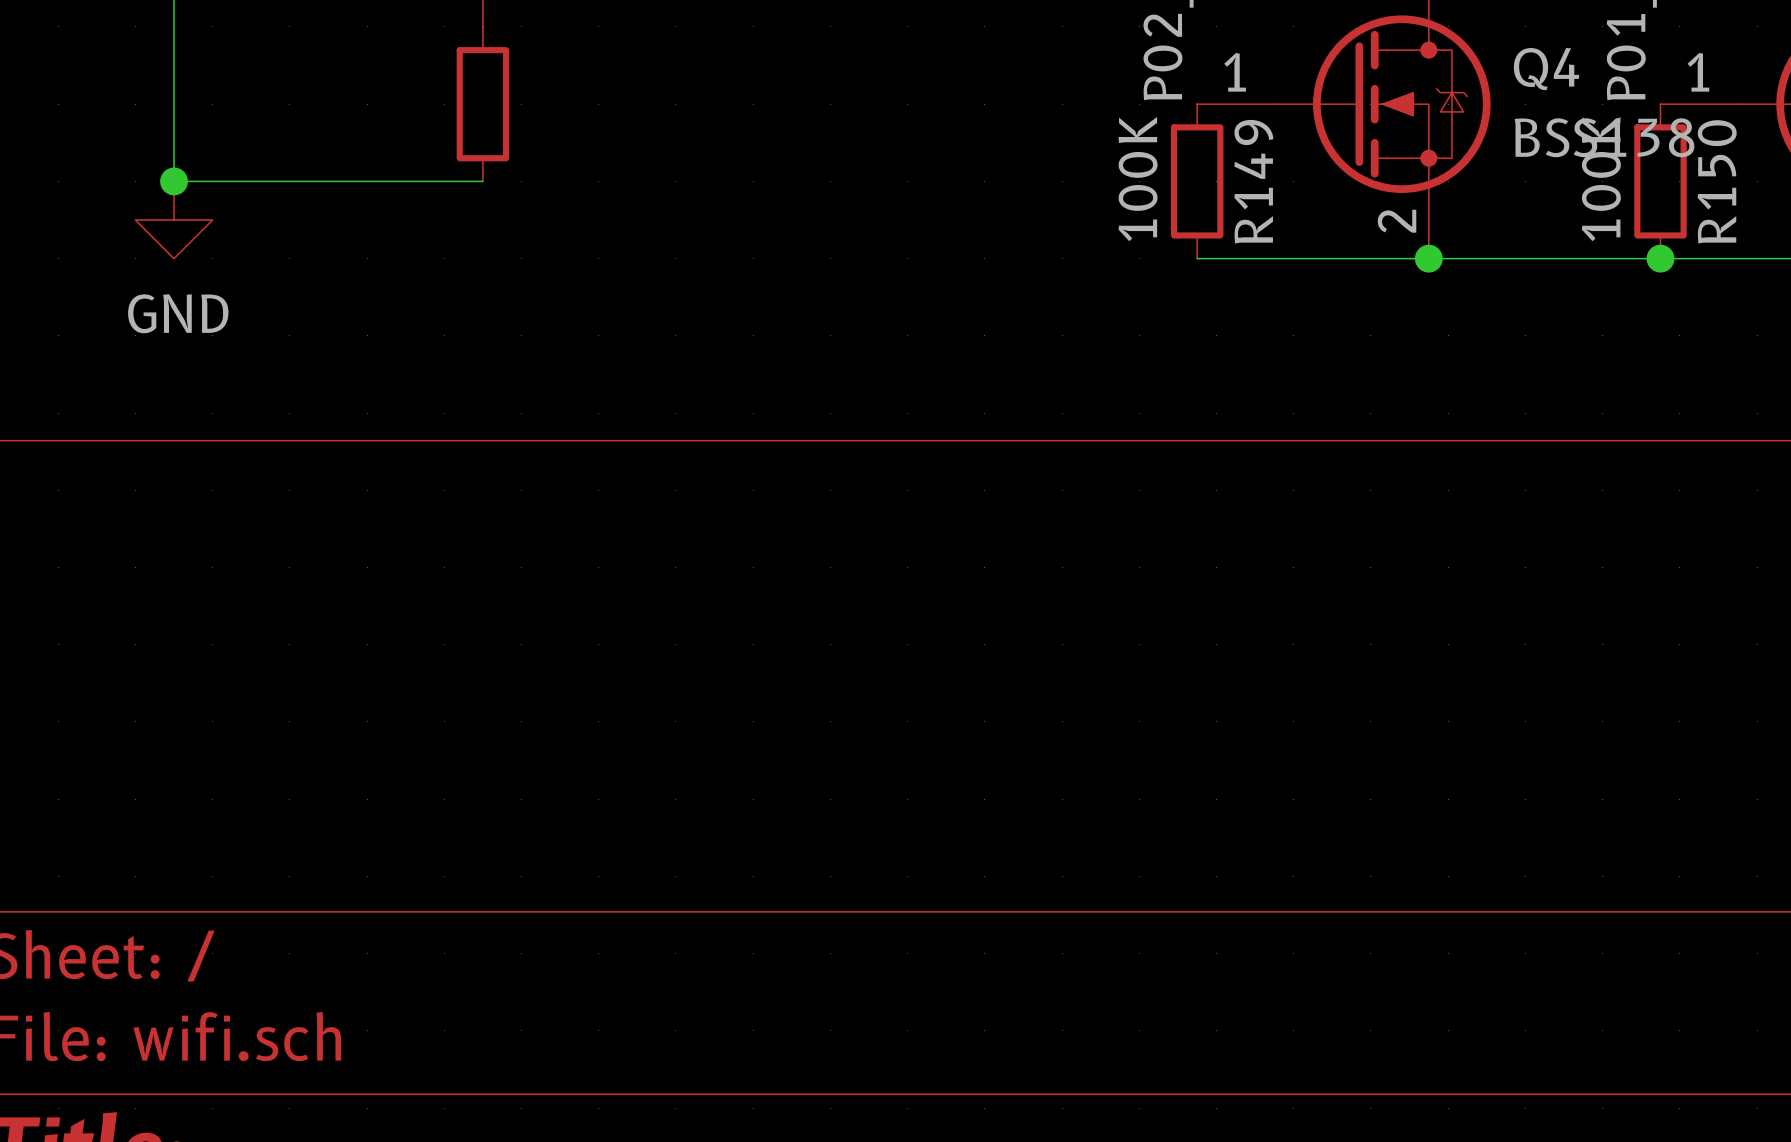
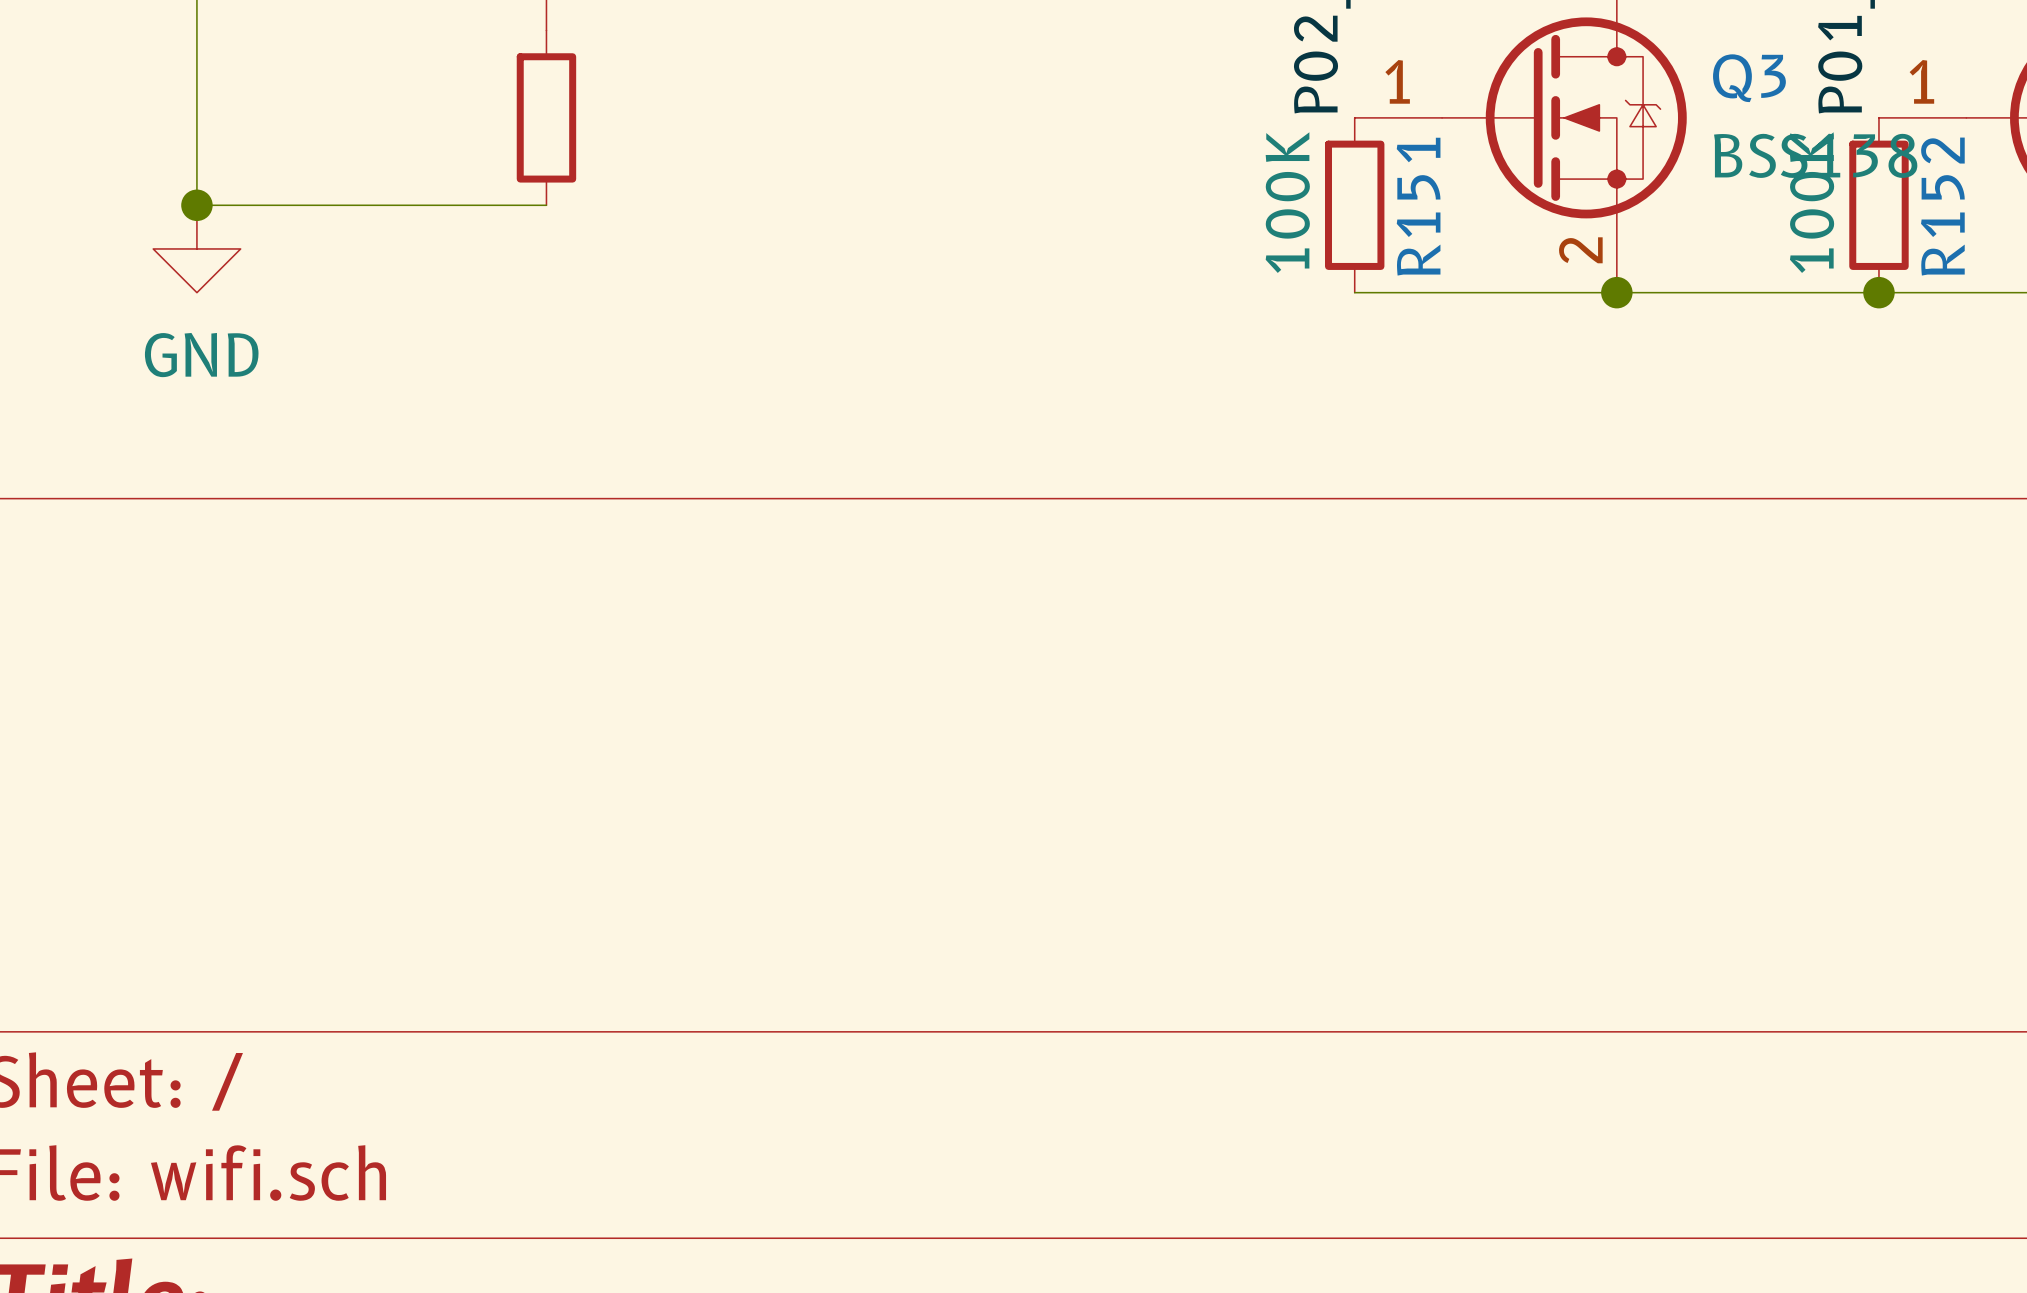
Q4 name: Q4 (1546, 69) -> Q3 (1749, 78)
R149 name: R149 (1253, 181) -> R151 (1418, 206)
R150 name: R150 (1717, 181) -> R152 (1942, 206)

